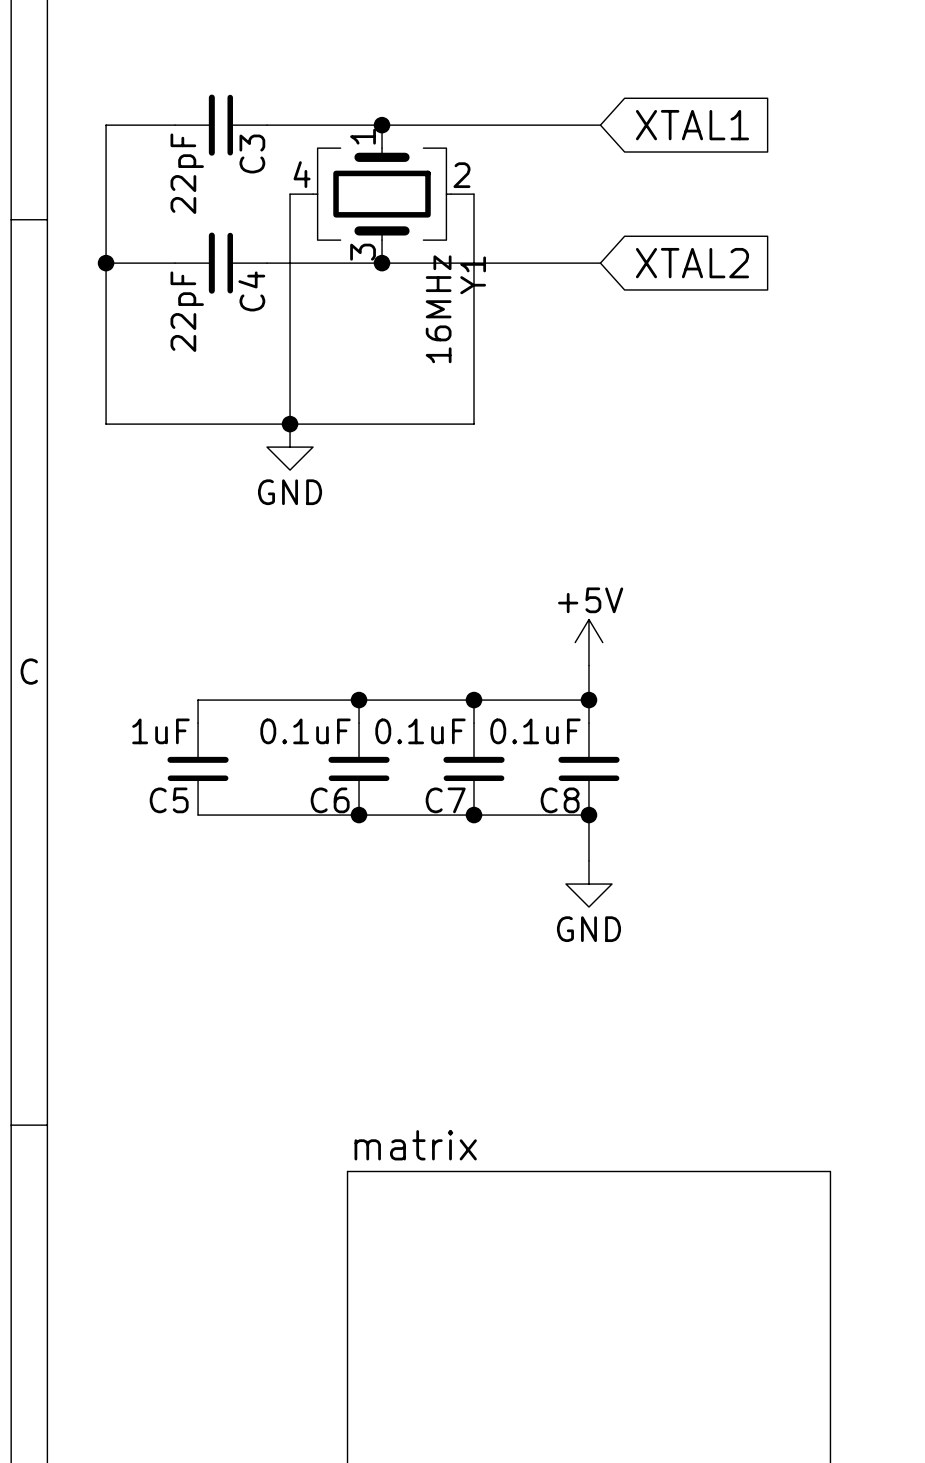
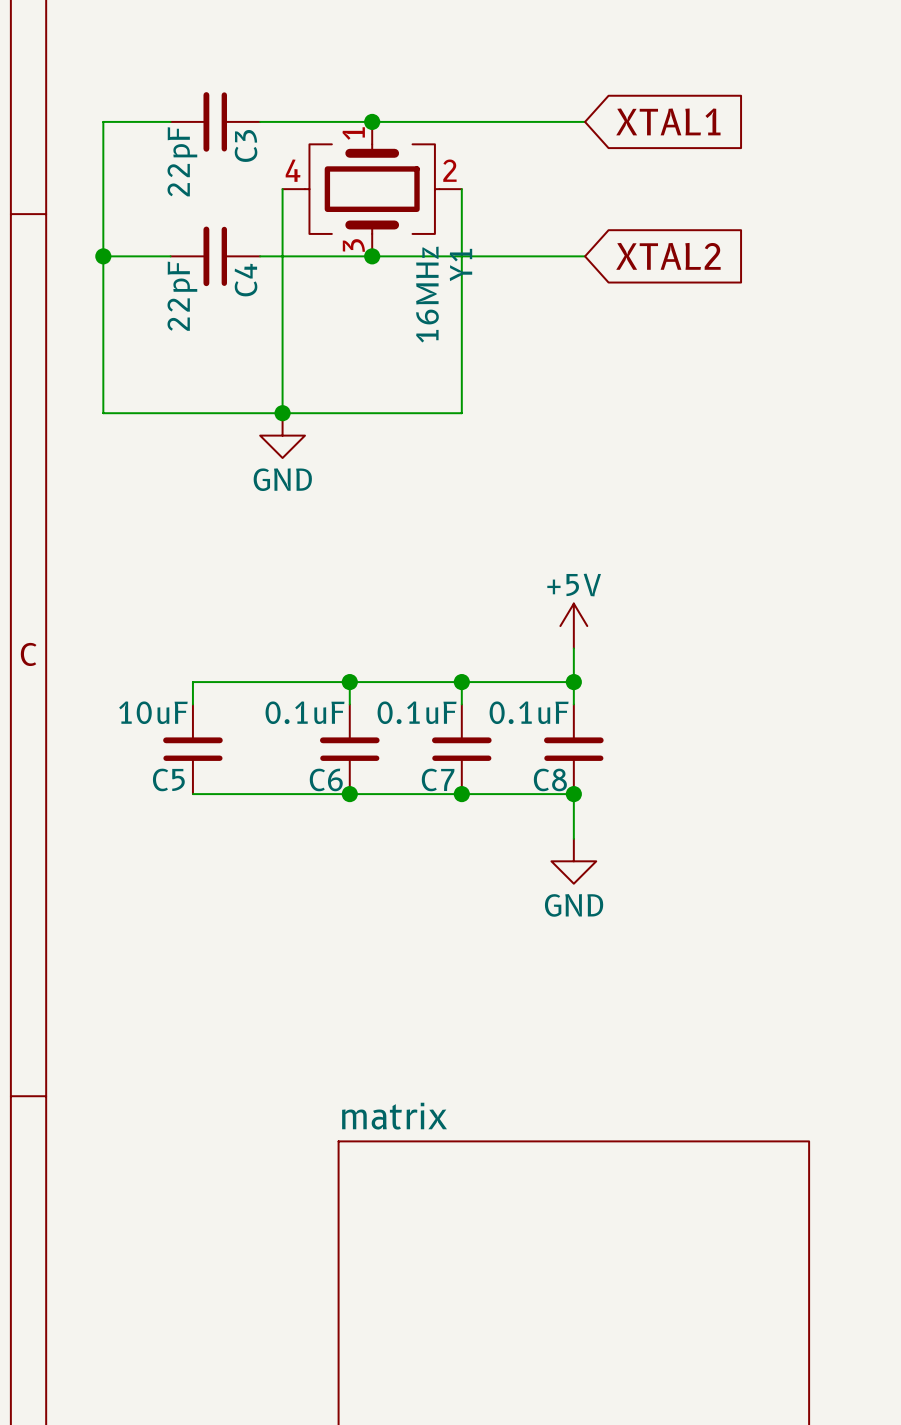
C5 value: 1uF (160, 731) -> 10uF (153, 712)

